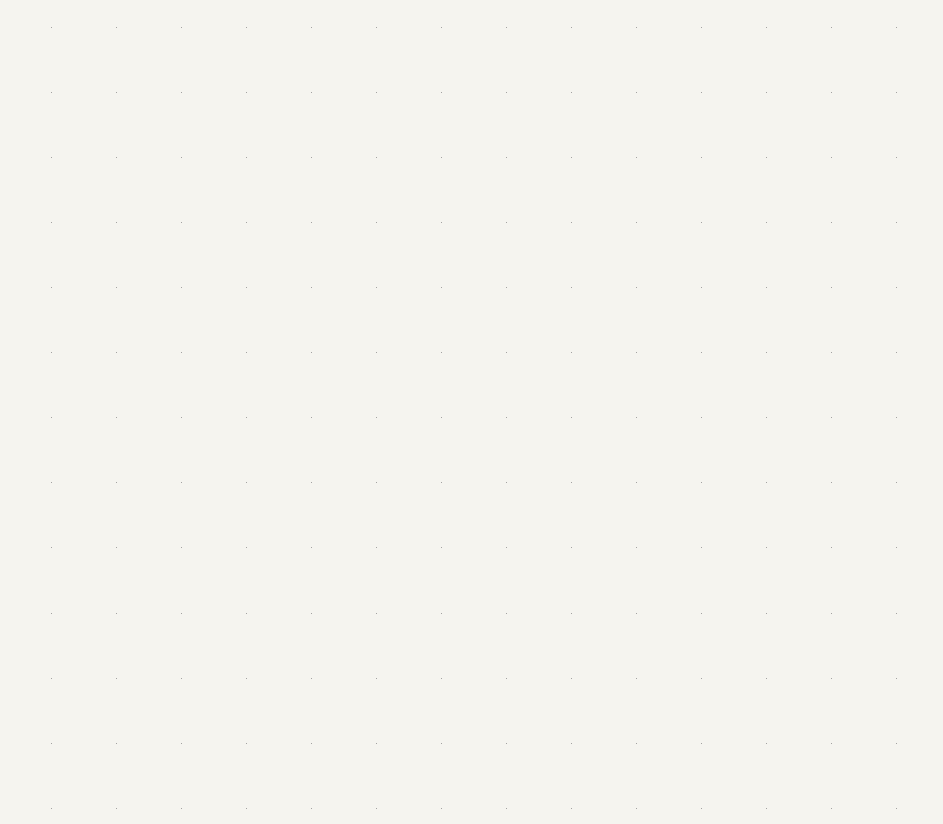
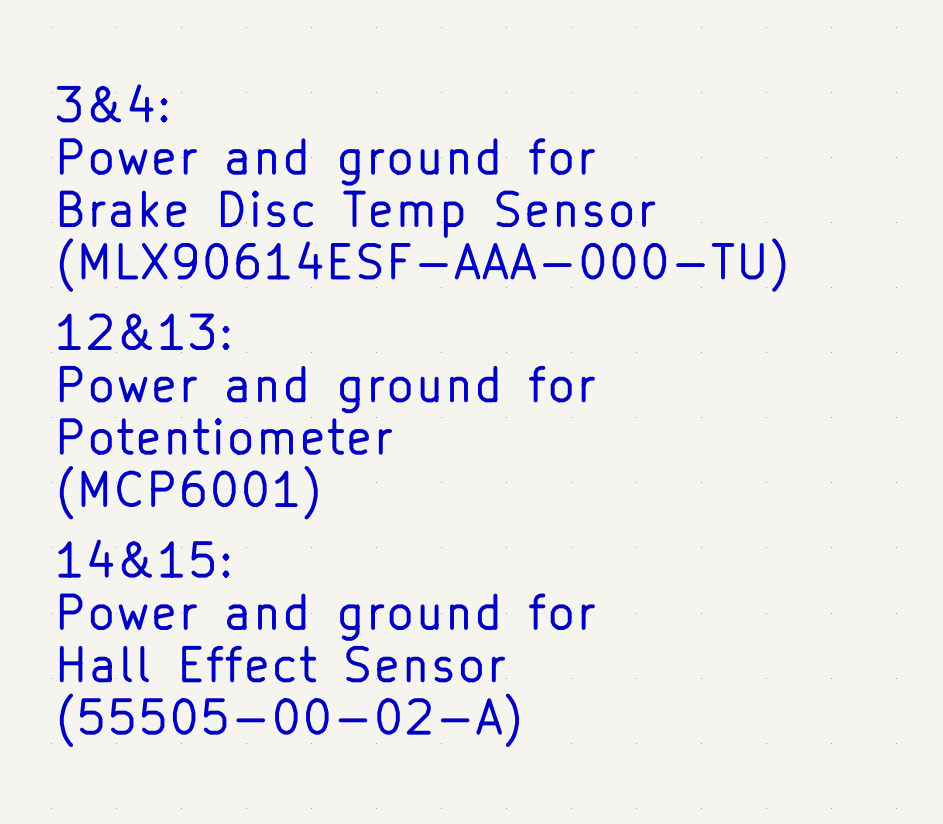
text: none -> 3&4: (112, 103)
text: none -> Power and ground for (327, 161)
text: none -> Brake Disc Temp Sensor (357, 214)
text: none -> (MLX90614ESF-AAA-000-TU) (422, 265)
text: none -> 12&13: (143, 331)
text: none -> Power and ground for (327, 389)
text: none -> Potentiometer (225, 436)
text: none -> (MCP6001) (188, 492)
text: none -> 14&15: (143, 558)
text: none -> Power and ground for (327, 617)
text: none -> Hall Effect Sensor (282, 664)
text: none -> (55505-00-02-A) (289, 720)

